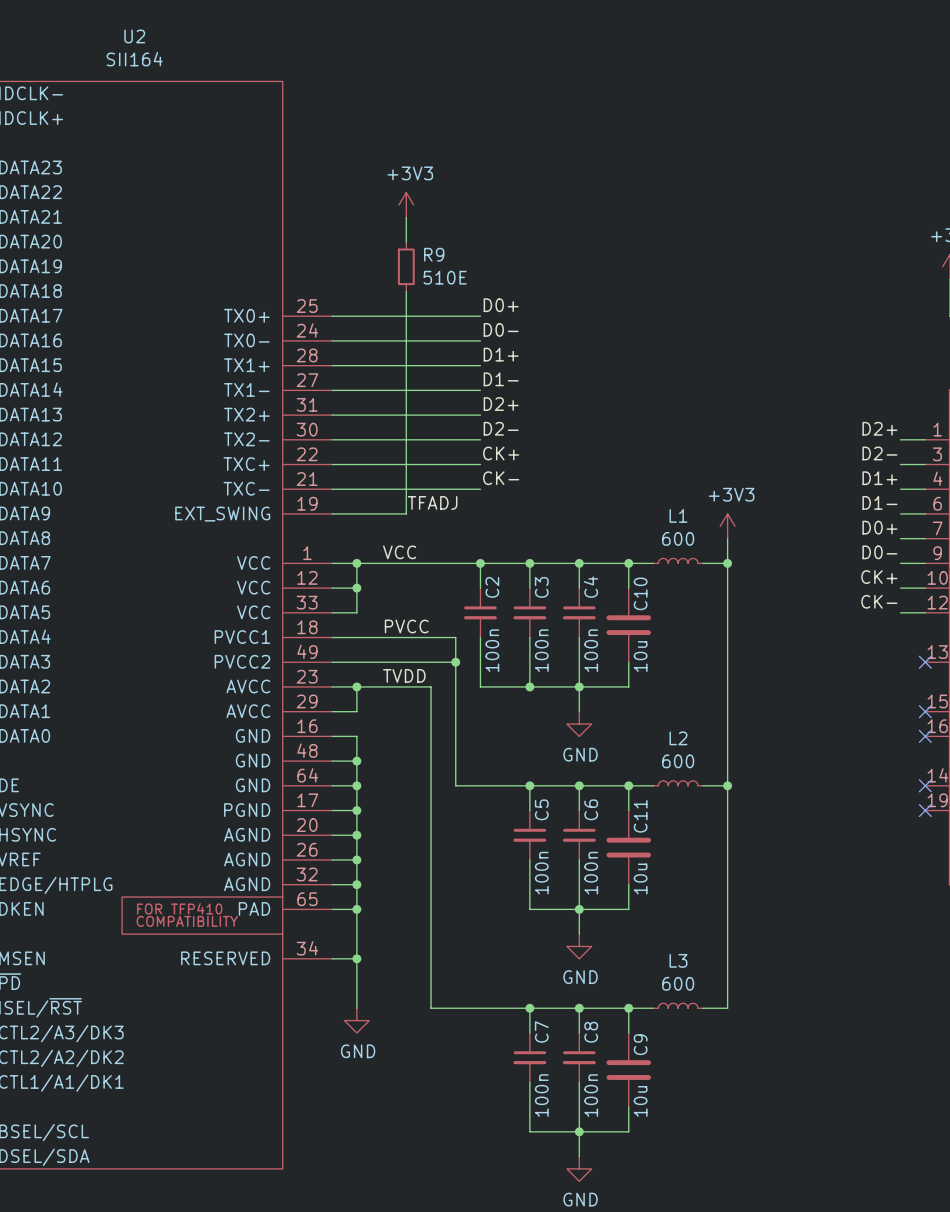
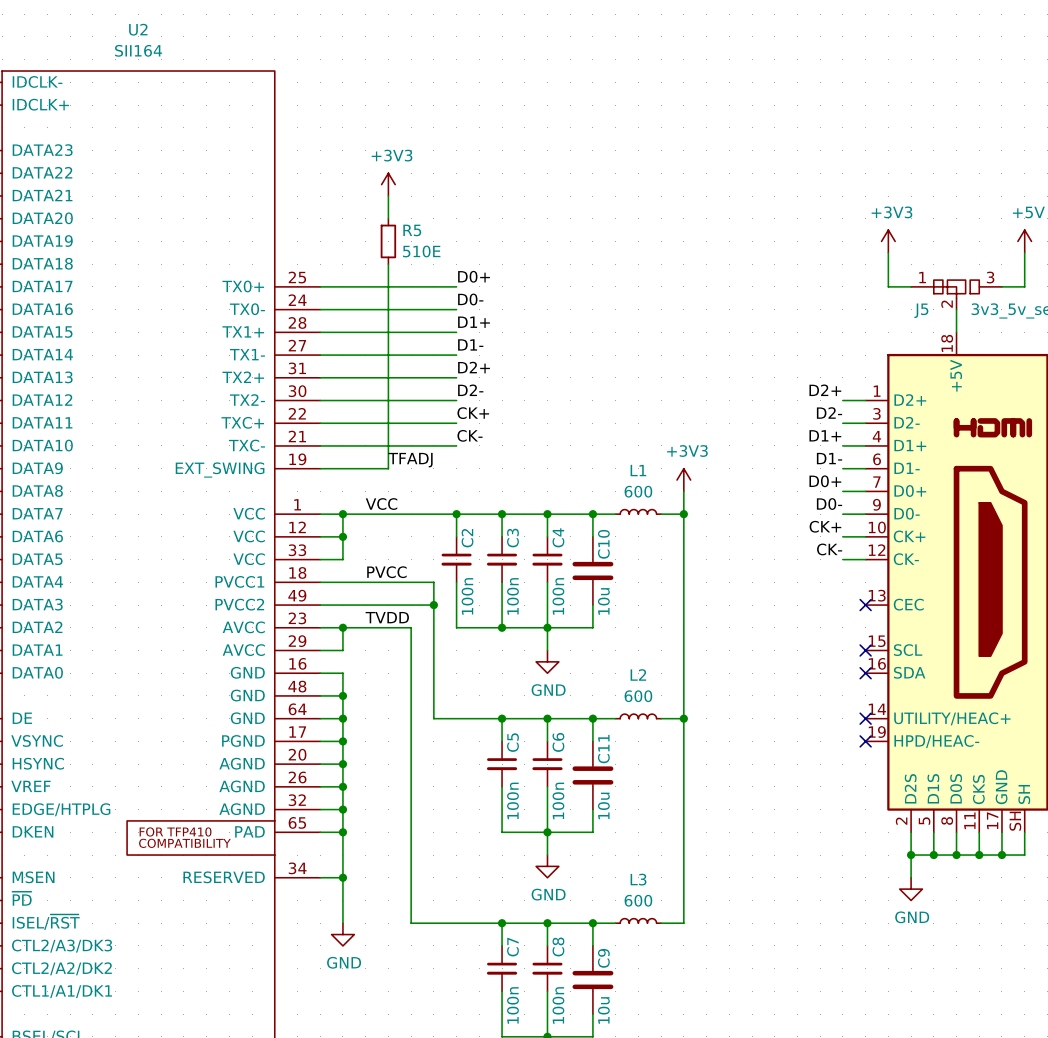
R9 name: R9 (434, 254) -> R5 (412, 230)

